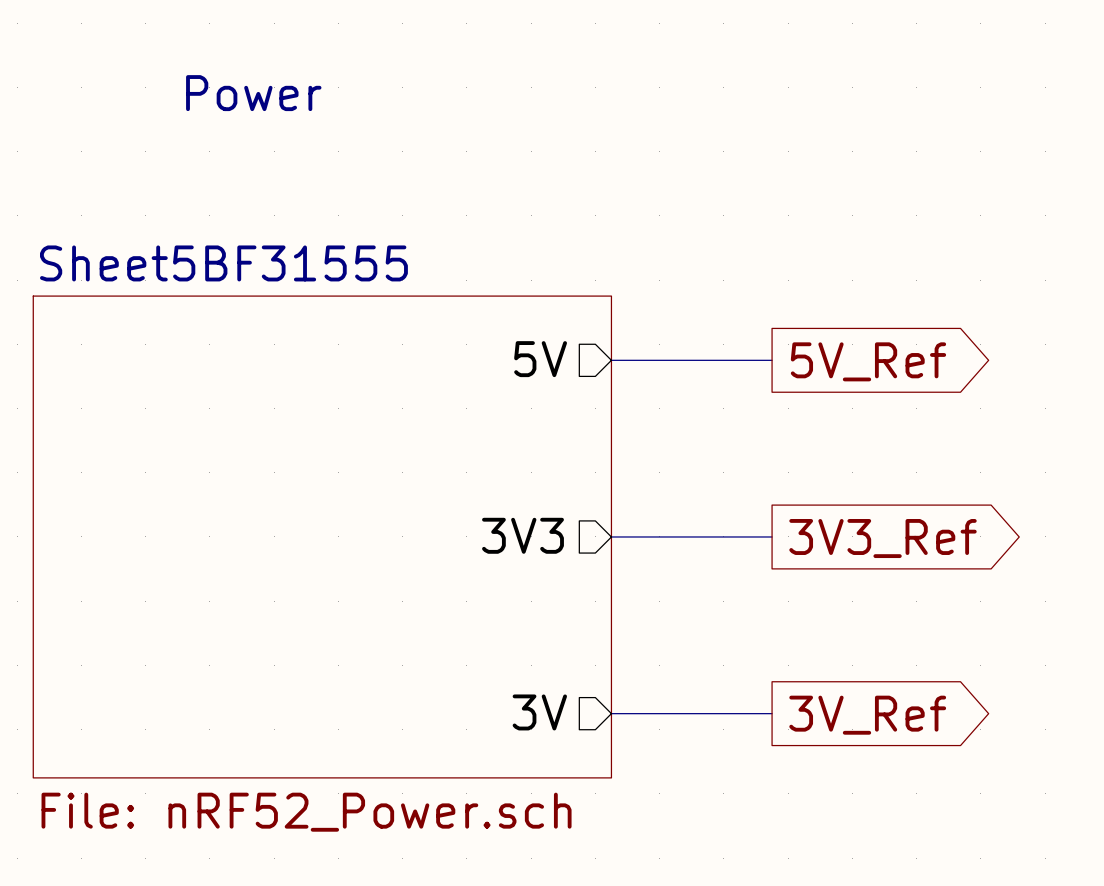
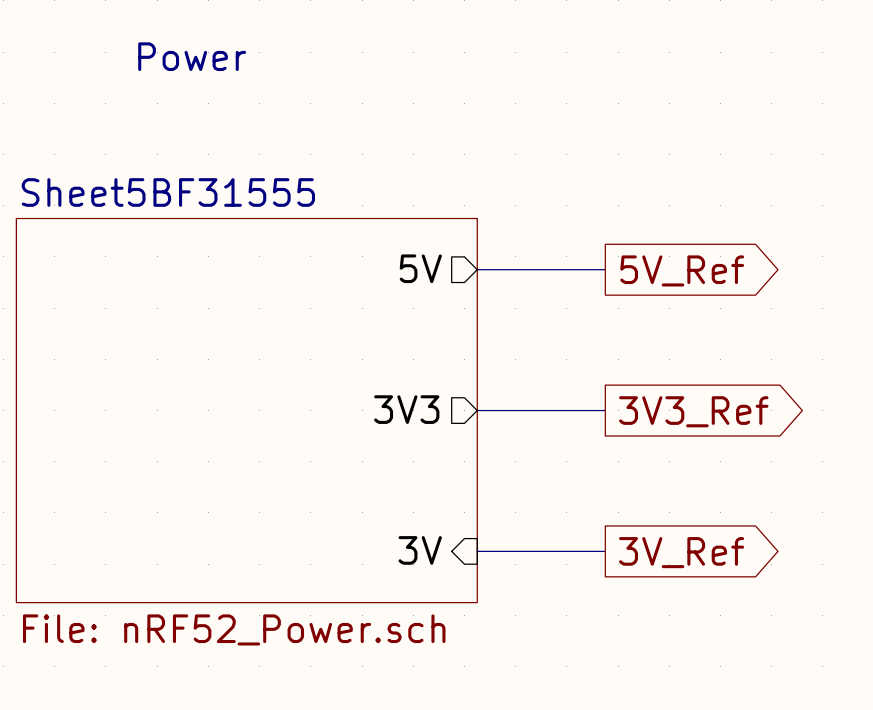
sheet pin shape: output (539, 712) -> input (420, 550)

